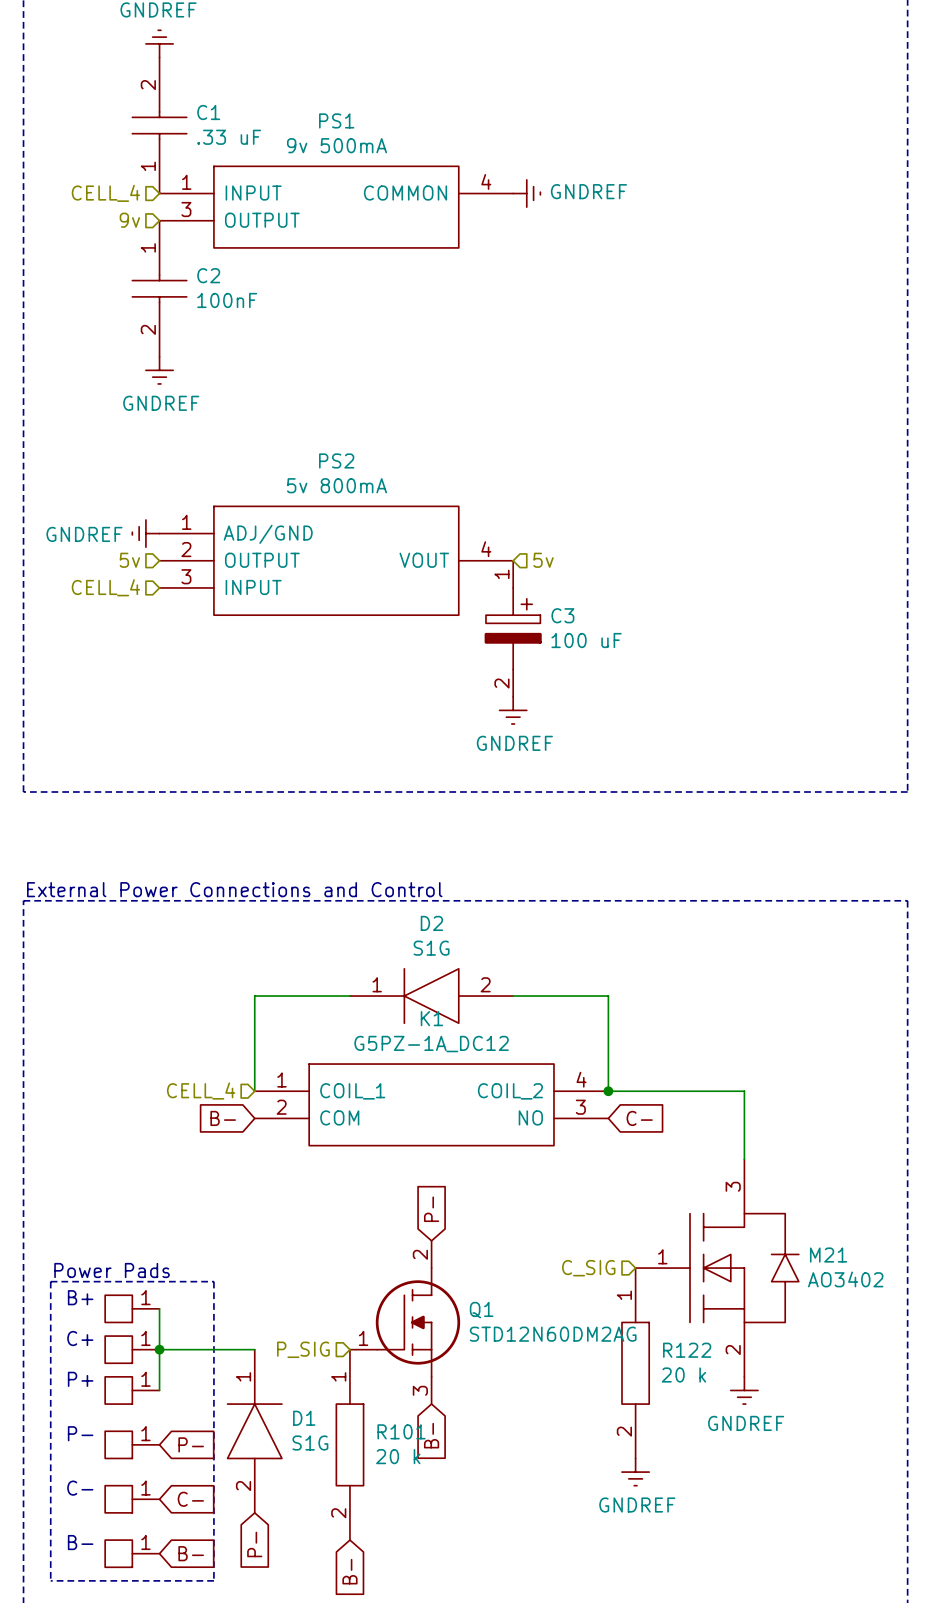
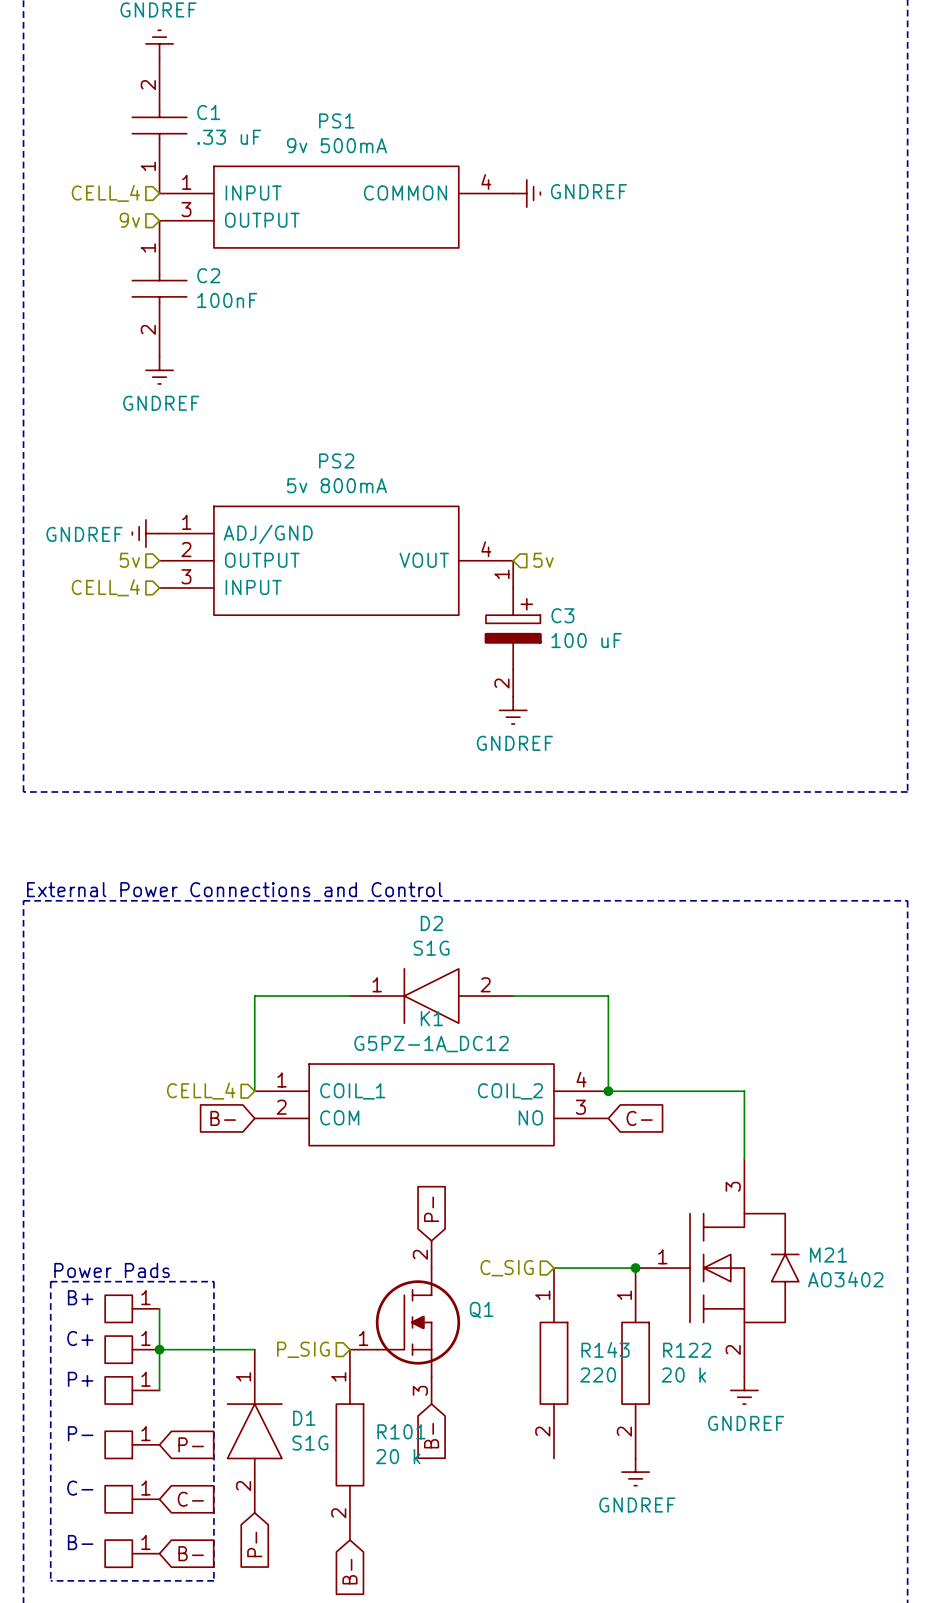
wire: none -> (553, 1268) (635, 1268)
hierarchical label position: C_SIG (588, 1268) -> C_SIG (507, 1268)
junction: none -> (635, 1268)
Q1 value: STD12N60DM2AG (553, 1334) -> none
R143: none -> (553, 1363)

